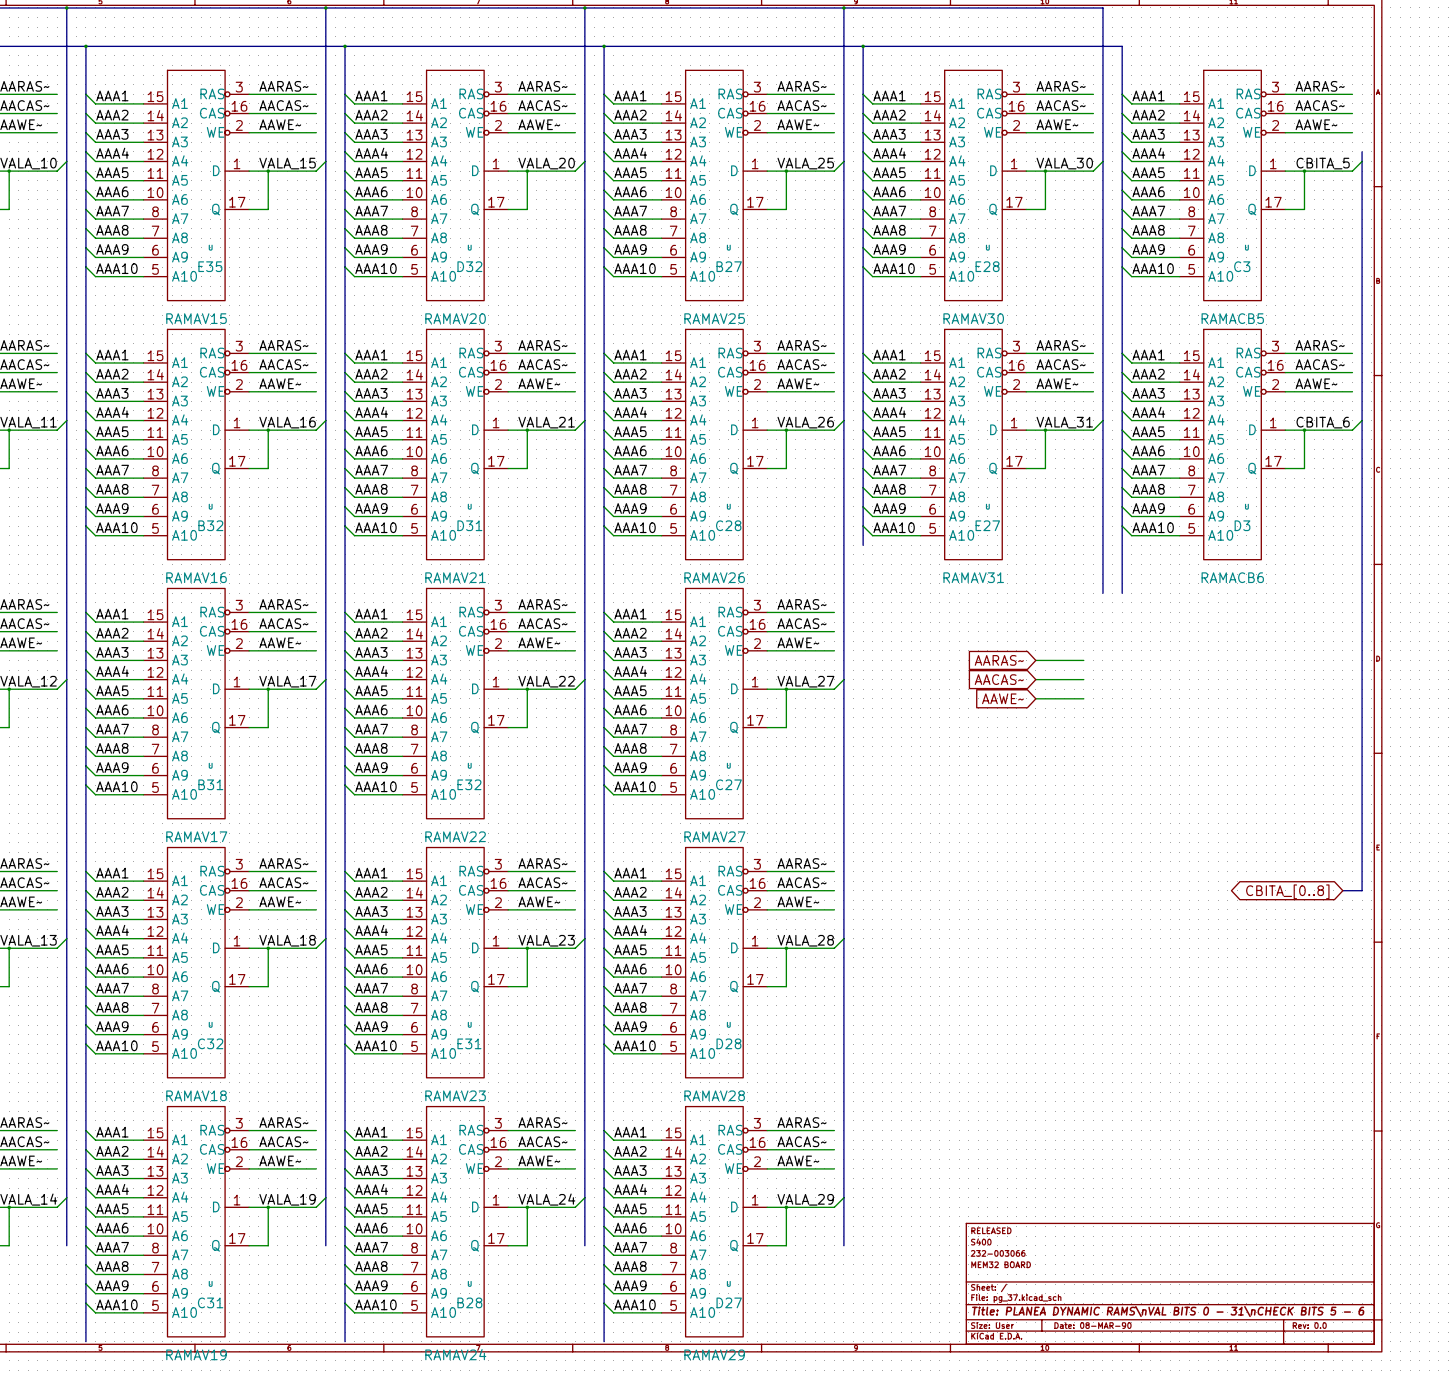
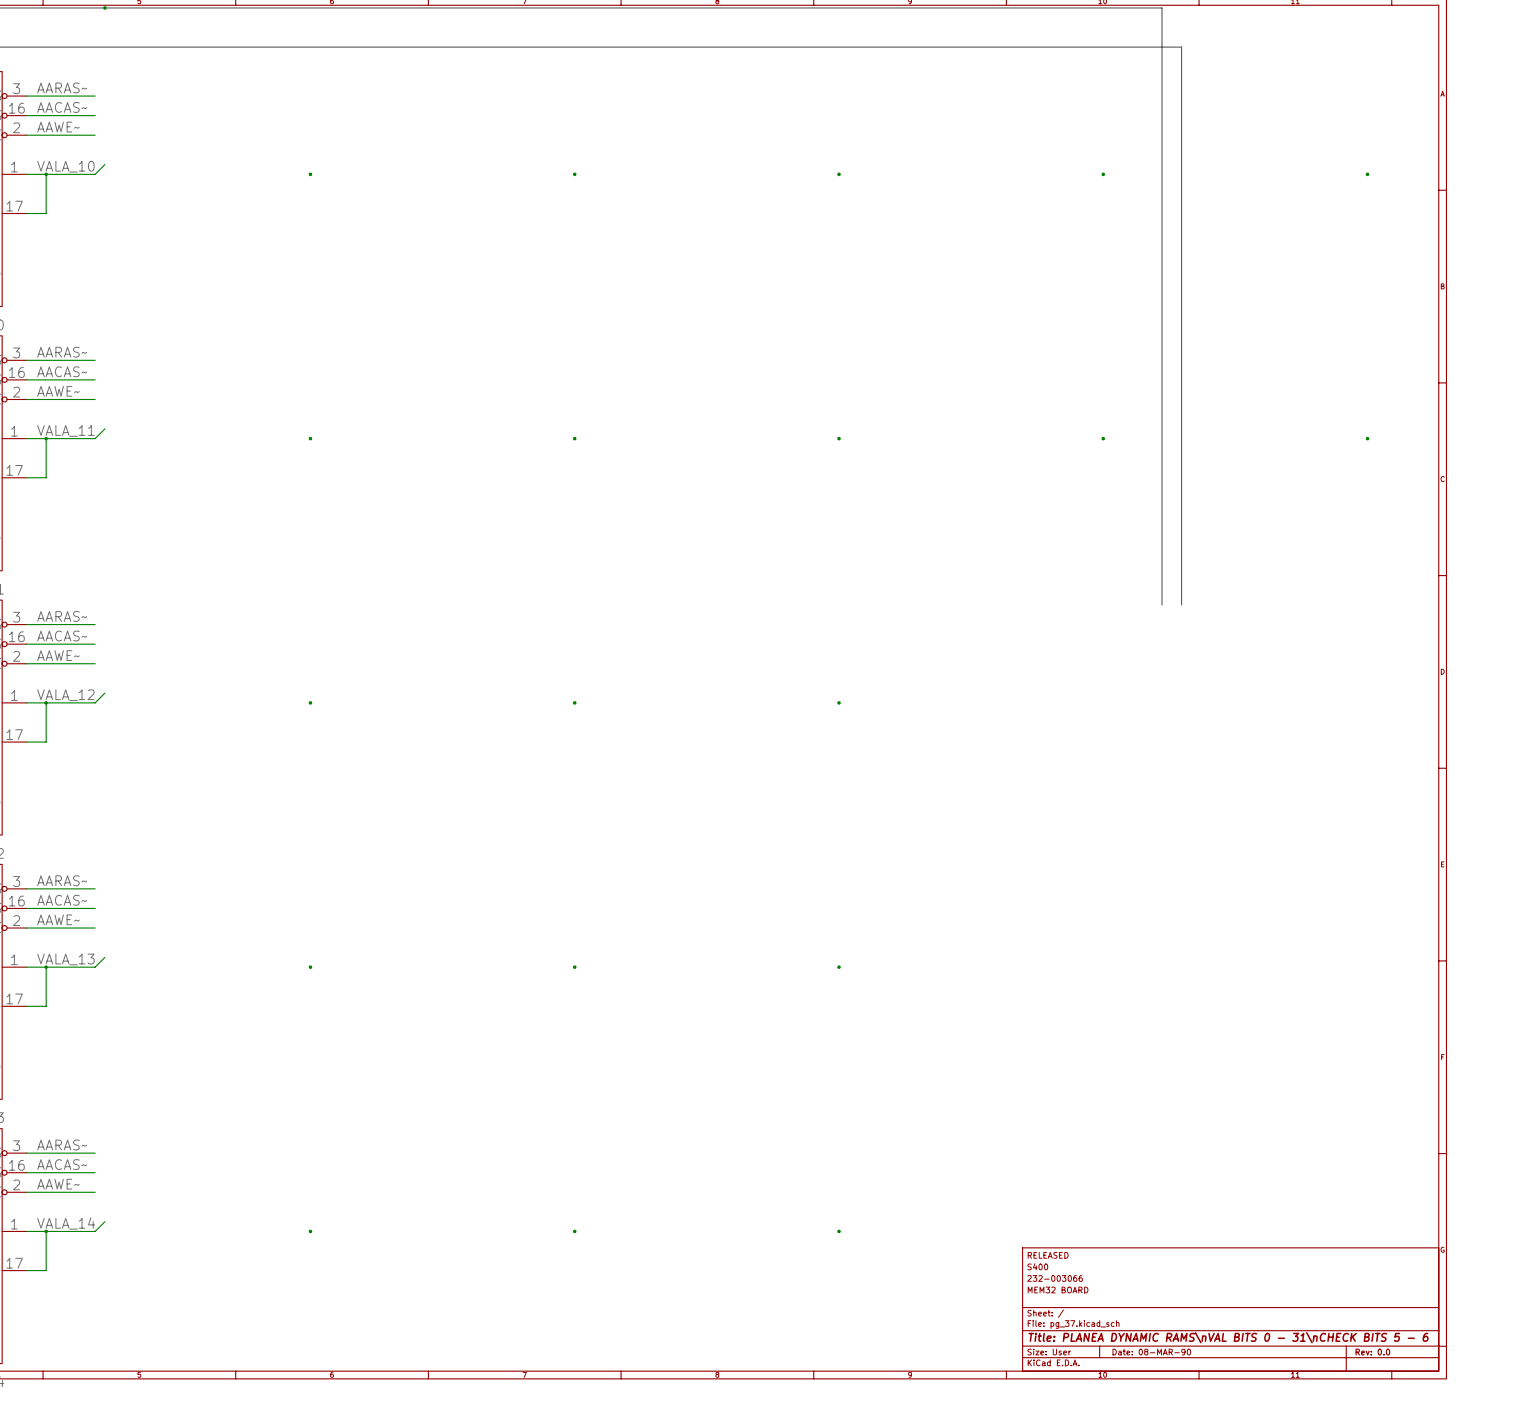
bus: (66, 7) (66, 1245) -> none
bus: (325, 7) (325, 1245) -> none
junction: (325, 7) -> none
bus: (584, 7) (584, 1245) -> none
junction: (584, 7) -> none
bus: (843, 7) (843, 1245) -> none
junction: (843, 7) -> none
bus: (85, 46) (85, 1341) -> none
junction: (85, 46) -> none
bus: (345, 46) (345, 1341) -> none
junction: (345, 46) -> none
bus: (604, 46) (604, 1341) -> none
junction: (604, 46) -> none
bus: (863, 46) (863, 545) -> none
junction: (863, 46) -> none
label: AARAS~ (283, 86) -> none
label: AARAS~ (542, 86) -> none
label: AARAS~ (802, 86) -> none
label: AARAS~ (1061, 86) -> none
label: AARAS~ (1320, 86) -> none
wire: (85, 94) (95, 103) (143, 103) -> none
wire: (249, 94) (316, 94) -> none
wire: (345, 94) (354, 103) (402, 103) -> none
wire: (508, 94) (575, 94) -> none
wire: (604, 94) (613, 103) (661, 103) -> none
wire: (767, 94) (834, 94) -> none
wire: (863, 94) (872, 103) (920, 103) -> none
wire: (1026, 94) (1093, 94) -> none
wire: (1122, 94) (1131, 103) (1179, 103) -> none
wire: (1285, 94) (1352, 94) -> none
label: AAA1 (112, 95) -> none
label: AAA1 (371, 95) -> none
label: AAA1 (630, 95) -> none
label: AAA1 (889, 95) -> none
label: AAA1 (1148, 95) -> none
label: AACAS~ (283, 105) -> none
label: AACAS~ (542, 105) -> none
label: AACAS~ (802, 105) -> none
label: AACAS~ (1061, 105) -> none
label: AACAS~ (1320, 105) -> none
wire: (85, 113) (95, 123) (143, 123) -> none
wire: (249, 113) (316, 113) -> none
wire: (345, 113) (354, 123) (402, 123) -> none
wire: (508, 113) (575, 113) -> none
wire: (604, 113) (613, 123) (661, 123) -> none
wire: (767, 113) (834, 113) -> none
wire: (863, 113) (872, 123) (920, 123) -> none
wire: (1026, 113) (1093, 113) -> none
wire: (1122, 113) (1131, 123) (1179, 123) -> none
wire: (1285, 113) (1352, 113) -> none
label: AAA2 (112, 115) -> none
label: AAA2 (371, 115) -> none
label: AAA2 (630, 115) -> none
label: AAA2 (889, 115) -> none
label: AAA2 (1148, 115) -> none
label: AAWE~ (280, 124) -> none
label: AAWE~ (539, 124) -> none
label: AAWE~ (798, 124) -> none
label: AAWE~ (1057, 124) -> none
label: AAWE~ (1316, 124) -> none
wire: (85, 132) (95, 142) (143, 142) -> none
wire: (249, 132) (316, 132) -> none
wire: (345, 132) (354, 142) (402, 142) -> none
wire: (508, 132) (575, 132) -> none
wire: (604, 132) (613, 142) (661, 142) -> none
wire: (767, 132) (834, 132) -> none
wire: (863, 132) (872, 142) (920, 142) -> none
wire: (1026, 132) (1093, 132) -> none
wire: (1122, 132) (1131, 142) (1179, 142) -> none
wire: (1285, 132) (1352, 132) -> none
label: AAA3 (112, 134) -> none
label: AAA3 (371, 134) -> none
label: AAA3 (630, 134) -> none
label: AAA3 (889, 134) -> none
label: AAA3 (1148, 134) -> none
wire: (85, 151) (95, 161) (143, 161) -> none
wire: (345, 151) (354, 161) (402, 161) -> none
wire: (604, 151) (613, 161) (661, 161) -> none
wire: (863, 151) (872, 161) (920, 161) -> none
wire: (1122, 151) (1131, 161) (1179, 161) -> none
bus: (1362, 151) (1362, 890) (1342, 890) -> none
label: AAA4 (112, 153) -> none
label: AAA4 (371, 153) -> none
label: AAA4 (630, 153) -> none
label: AAA4 (889, 153) -> none
label: AAA4 (1148, 153) -> none
wire: (325, 161) (316, 171) (249, 171) -> none
wire: (584, 161) (575, 171) (508, 171) -> none
wire: (843, 161) (834, 171) (767, 171) -> none
wire: (1102, 161) (1093, 171) (1026, 171) -> none
wire: (1362, 161) (1352, 171) (1285, 171) -> none
label: VALA_15 (287, 163) -> none
label: VALA_20 (546, 163) -> none
label: VALA_25 (805, 163) -> none
label: VALA_30 (1064, 163) -> none
label: CBITA_5 (1323, 163) -> none
wire: (85, 171) (95, 180) (143, 180) -> none
wire: (268, 171) (268, 209) (249, 209) -> none
wire: (345, 171) (354, 180) (402, 180) -> none
wire: (527, 171) (527, 209) (508, 209) -> none
wire: (604, 171) (613, 180) (661, 180) -> none
wire: (786, 171) (786, 209) (767, 209) -> none
wire: (863, 171) (872, 180) (920, 180) -> none
wire: (1045, 171) (1045, 209) (1026, 209) -> none
wire: (1122, 171) (1131, 180) (1179, 180) -> none
wire: (1304, 171) (1304, 209) (1285, 209) -> none
label: AAA5 (112, 172) -> none
label: AAA5 (371, 172) -> none
label: AAA5 (630, 172) -> none
label: AAA5 (889, 172) -> none
label: AAA5 (1148, 172) -> none
part: (196, 185) -> none
part: (455, 185) -> none
part: (714, 185) -> none
part: (973, 185) -> none
part: (1232, 185) -> none
wire: (85, 190) (95, 199) (143, 199) -> none
wire: (345, 190) (354, 199) (402, 199) -> none
wire: (604, 190) (613, 199) (661, 199) -> none
wire: (863, 190) (872, 199) (920, 199) -> none
wire: (1122, 190) (1131, 199) (1179, 199) -> none
label: AAA6 (112, 191) -> none
label: AAA6 (371, 191) -> none
label: AAA6 (630, 191) -> none
label: AAA6 (889, 191) -> none
label: AAA6 (1148, 191) -> none
wire: (85, 209) (95, 219) (143, 219) -> none
wire: (345, 209) (354, 219) (402, 219) -> none
wire: (604, 209) (613, 219) (661, 219) -> none
wire: (863, 209) (872, 219) (920, 219) -> none
wire: (1122, 209) (1131, 219) (1179, 219) -> none
label: AAA7 (112, 211) -> none
label: AAA7 (371, 211) -> none
label: AAA7 (630, 211) -> none
label: AAA7 (889, 211) -> none
label: AAA7 (1148, 211) -> none
wire: (85, 228) (95, 238) (143, 238) -> none
wire: (345, 228) (354, 238) (402, 238) -> none
wire: (604, 228) (613, 238) (661, 238) -> none
wire: (863, 228) (872, 238) (920, 238) -> none
wire: (1122, 228) (1131, 238) (1179, 238) -> none
label: AAA8 (112, 230) -> none
label: AAA8 (371, 230) -> none
label: AAA8 (630, 230) -> none
label: AAA8 (889, 230) -> none
label: AAA8 (1148, 230) -> none
wire: (85, 247) (95, 257) (143, 257) -> none
wire: (345, 247) (354, 257) (402, 257) -> none
wire: (604, 247) (613, 257) (661, 257) -> none
wire: (863, 247) (872, 257) (920, 257) -> none
wire: (1122, 247) (1131, 257) (1179, 257) -> none
label: AAA9 (112, 249) -> none
label: AAA9 (371, 249) -> none
label: AAA9 (630, 249) -> none
label: AAA9 (889, 249) -> none
label: AAA9 (1148, 249) -> none
wire: (85, 267) (95, 276) (143, 276) -> none
wire: (345, 267) (354, 276) (402, 276) -> none
wire: (604, 267) (613, 276) (661, 276) -> none
wire: (863, 267) (872, 276) (920, 276) -> none
wire: (1122, 267) (1131, 276) (1179, 276) -> none
label: AAA10 (116, 268) -> none
label: AAA10 (375, 268) -> none
label: AAA10 (635, 268) -> none
label: AAA10 (894, 268) -> none
label: AAA10 (1153, 268) -> none
label: AARAS~ (283, 345) -> none
label: AARAS~ (542, 345) -> none
label: AARAS~ (802, 345) -> none
label: AARAS~ (1061, 345) -> none
label: AARAS~ (1320, 345) -> none
wire: (85, 353) (95, 362) (143, 362) -> none
wire: (249, 353) (316, 353) -> none
wire: (345, 353) (354, 362) (402, 362) -> none
wire: (508, 353) (575, 353) -> none
wire: (604, 353) (613, 362) (661, 362) -> none
wire: (767, 353) (834, 353) -> none
wire: (863, 353) (872, 362) (920, 362) -> none
wire: (1026, 353) (1093, 353) -> none
wire: (1122, 353) (1131, 362) (1179, 362) -> none
wire: (1285, 353) (1352, 353) -> none
label: AAA1 (112, 355) -> none
label: AAA1 (371, 355) -> none
label: AAA1 (630, 355) -> none
label: AAA1 (889, 355) -> none
label: AAA1 (1148, 355) -> none
label: AACAS~ (283, 364) -> none
label: AACAS~ (542, 364) -> none
label: AACAS~ (802, 364) -> none
label: AACAS~ (1061, 364) -> none
label: AACAS~ (1320, 364) -> none
wire: (85, 372) (95, 382) (143, 382) -> none
wire: (249, 372) (316, 372) -> none
wire: (345, 372) (354, 382) (402, 382) -> none
wire: (508, 372) (575, 372) -> none
wire: (604, 372) (613, 382) (661, 382) -> none
wire: (767, 372) (834, 372) -> none
wire: (863, 372) (872, 382) (920, 382) -> none
wire: (1026, 372) (1093, 372) -> none
wire: (1122, 372) (1131, 382) (1179, 382) -> none
wire: (1285, 372) (1352, 372) -> none
label: AAA2 (112, 374) -> none
label: AAA2 (371, 374) -> none
label: AAA2 (630, 374) -> none
label: AAA2 (889, 374) -> none
label: AAA2 (1148, 374) -> none
label: AAWE~ (280, 383) -> none
label: AAWE~ (539, 383) -> none
label: AAWE~ (798, 383) -> none
label: AAWE~ (1057, 383) -> none
label: AAWE~ (1316, 383) -> none
wire: (85, 391) (95, 401) (143, 401) -> none
wire: (249, 391) (316, 391) -> none
wire: (345, 391) (354, 401) (402, 401) -> none
wire: (508, 391) (575, 391) -> none
wire: (604, 391) (613, 401) (661, 401) -> none
wire: (767, 391) (834, 391) -> none
wire: (863, 391) (872, 401) (920, 401) -> none
wire: (1026, 391) (1093, 391) -> none
wire: (1122, 391) (1131, 401) (1179, 401) -> none
wire: (1285, 391) (1352, 391) -> none
label: AAA3 (112, 393) -> none
label: AAA3 (371, 393) -> none
label: AAA3 (630, 393) -> none
label: AAA3 (889, 393) -> none
label: AAA3 (1148, 393) -> none
wire: (85, 410) (95, 420) (143, 420) -> none
wire: (345, 410) (354, 420) (402, 420) -> none
wire: (604, 410) (613, 420) (661, 420) -> none
wire: (863, 410) (872, 420) (920, 420) -> none
wire: (1122, 410) (1131, 420) (1179, 420) -> none
label: AAA4 (112, 412) -> none
label: AAA4 (371, 412) -> none
label: AAA4 (630, 412) -> none
label: AAA4 (889, 412) -> none
label: AAA4 (1148, 412) -> none
wire: (325, 420) (316, 430) (249, 430) -> none
wire: (584, 420) (575, 430) (508, 430) -> none
wire: (843, 420) (834, 430) (767, 430) -> none
wire: (1102, 420) (1093, 430) (1026, 430) -> none
wire: (1362, 420) (1352, 430) (1285, 430) -> none
label: VALA_16 (287, 422) -> none
label: VALA_21 (546, 422) -> none
label: VALA_26 (805, 422) -> none
label: VALA_31 (1064, 422) -> none
label: CBITA_6 (1323, 422) -> none
wire: (85, 430) (95, 439) (143, 439) -> none
wire: (268, 430) (268, 468) (249, 468) -> none
wire: (345, 430) (354, 439) (402, 439) -> none
wire: (527, 430) (527, 468) (508, 468) -> none
wire: (604, 430) (613, 439) (661, 439) -> none
wire: (786, 430) (786, 468) (767, 468) -> none
wire: (863, 430) (872, 439) (920, 439) -> none
wire: (1045, 430) (1045, 468) (1026, 468) -> none
wire: (1122, 430) (1131, 439) (1179, 439) -> none
wire: (1304, 430) (1304, 468) (1285, 468) -> none
label: AAA5 (112, 431) -> none
label: AAA5 (371, 431) -> none
label: AAA5 (630, 431) -> none
label: AAA5 (889, 431) -> none
label: AAA5 (1148, 431) -> none
part: (196, 444) -> none
part: (455, 444) -> none
part: (714, 444) -> none
part: (973, 444) -> none
part: (1232, 444) -> none
wire: (85, 449) (95, 458) (143, 458) -> none
wire: (345, 449) (354, 458) (402, 458) -> none
wire: (604, 449) (613, 458) (661, 458) -> none
wire: (863, 449) (872, 458) (920, 458) -> none
wire: (1122, 449) (1131, 458) (1179, 458) -> none
label: AAA6 (112, 450) -> none
label: AAA6 (371, 450) -> none
label: AAA6 (630, 450) -> none
label: AAA6 (889, 450) -> none
label: AAA6 (1148, 450) -> none
wire: (85, 468) (95, 478) (143, 478) -> none
wire: (345, 468) (354, 478) (402, 478) -> none
wire: (604, 468) (613, 478) (661, 478) -> none
wire: (863, 468) (872, 478) (920, 478) -> none
wire: (1122, 468) (1131, 478) (1179, 478) -> none
label: AAA7 (112, 470) -> none
label: AAA7 (371, 470) -> none
label: AAA7 (630, 470) -> none
label: AAA7 (889, 470) -> none
label: AAA7 (1148, 470) -> none
wire: (85, 487) (95, 497) (143, 497) -> none
wire: (345, 487) (354, 497) (402, 497) -> none
wire: (604, 487) (613, 497) (661, 497) -> none
wire: (863, 487) (872, 497) (920, 497) -> none
wire: (1122, 487) (1131, 497) (1179, 497) -> none
label: AAA8 (112, 489) -> none
label: AAA8 (371, 489) -> none
label: AAA8 (630, 489) -> none
label: AAA8 (889, 489) -> none
label: AAA8 (1148, 489) -> none
wire: (85, 506) (95, 516) (143, 516) -> none
wire: (345, 506) (354, 516) (402, 516) -> none
wire: (604, 506) (613, 516) (661, 516) -> none
wire: (863, 506) (872, 516) (920, 516) -> none
wire: (1122, 506) (1131, 516) (1179, 516) -> none
label: AAA9 (112, 508) -> none
label: AAA9 (371, 508) -> none
label: AAA9 (630, 508) -> none
label: AAA9 (889, 508) -> none
label: AAA9 (1148, 508) -> none
wire: (85, 526) (95, 535) (143, 535) -> none
wire: (345, 526) (354, 535) (402, 535) -> none
wire: (604, 526) (613, 535) (661, 535) -> none
wire: (863, 526) (872, 535) (920, 535) -> none
wire: (1122, 526) (1131, 535) (1179, 535) -> none
label: AAA10 (116, 527) -> none
label: AAA10 (375, 527) -> none
label: AAA10 (635, 527) -> none
label: AAA10 (894, 527) -> none
label: AAA10 (1153, 527) -> none
label: AARAS~ (283, 604) -> none
label: AARAS~ (542, 604) -> none
label: AARAS~ (802, 604) -> none
wire: (85, 612) (95, 622) (143, 622) -> none
wire: (249, 612) (316, 612) -> none
wire: (345, 612) (354, 622) (402, 622) -> none
wire: (508, 612) (575, 612) -> none
wire: (604, 612) (613, 622) (661, 622) -> none
wire: (767, 612) (834, 612) -> none
label: AAA1 (112, 614) -> none
label: AAA1 (371, 614) -> none
label: AAA1 (630, 614) -> none
label: AACAS~ (283, 623) -> none
label: AACAS~ (542, 623) -> none
label: AACAS~ (802, 623) -> none
wire: (85, 631) (95, 641) (143, 641) -> none
wire: (249, 631) (316, 631) -> none
wire: (345, 631) (354, 641) (402, 641) -> none
wire: (508, 631) (575, 631) -> none
wire: (604, 631) (613, 641) (661, 641) -> none
wire: (767, 631) (834, 631) -> none
label: AAA2 (112, 633) -> none
label: AAA2 (371, 633) -> none
label: AAA2 (630, 633) -> none
label: AAWE~ (280, 642) -> none
label: AAWE~ (539, 642) -> none
label: AAWE~ (798, 642) -> none
wire: (85, 650) (95, 660) (143, 660) -> none
wire: (249, 650) (316, 650) -> none
wire: (345, 650) (354, 660) (402, 660) -> none
wire: (508, 650) (575, 650) -> none
wire: (604, 650) (613, 660) (661, 660) -> none
wire: (767, 650) (834, 650) -> none
label: AAA3 (112, 652) -> none
label: AAA3 (371, 652) -> none
label: AAA3 (630, 652) -> none
global label: AARAS~ (999, 660) -> none
wire: (1035, 660) (1083, 660) -> none
wire: (85, 670) (95, 679) (143, 679) -> none
wire: (345, 670) (354, 679) (402, 679) -> none
wire: (604, 670) (613, 679) (661, 679) -> none
label: AAA4 (112, 671) -> none
label: AAA4 (371, 671) -> none
label: AAA4 (630, 671) -> none
wire: (325, 679) (316, 689) (249, 689) -> none
wire: (584, 679) (575, 689) (508, 689) -> none
wire: (843, 679) (834, 689) (767, 689) -> none
global label: AACAS~ (999, 679) -> none
wire: (1035, 679) (1083, 679) -> none
label: VALA_17 (287, 681) -> none
label: VALA_22 (546, 681) -> none
label: VALA_27 (805, 681) -> none
wire: (85, 689) (95, 698) (143, 698) -> none
wire: (268, 689) (268, 727) (249, 727) -> none
wire: (345, 689) (354, 698) (402, 698) -> none
wire: (527, 689) (527, 727) (508, 727) -> none
wire: (604, 689) (613, 698) (661, 698) -> none
wire: (786, 689) (786, 727) (767, 727) -> none
label: AAA5 (112, 690) -> none
label: AAA5 (371, 690) -> none
label: AAA5 (630, 690) -> none
global label: AAWE~ (1002, 698) -> none
wire: (1035, 698) (1083, 698) -> none
part: (196, 703) -> none
part: (455, 703) -> none
part: (714, 703) -> none
wire: (85, 708) (95, 717) (143, 717) -> none
wire: (345, 708) (354, 717) (402, 717) -> none
wire: (604, 708) (613, 717) (661, 717) -> none
label: AAA6 (112, 710) -> none
label: AAA6 (371, 710) -> none
label: AAA6 (630, 710) -> none
wire: (85, 727) (95, 737) (143, 737) -> none
wire: (345, 727) (354, 737) (402, 737) -> none
wire: (604, 727) (613, 737) (661, 737) -> none
label: AAA7 (112, 729) -> none
label: AAA7 (371, 729) -> none
label: AAA7 (630, 729) -> none
wire: (85, 746) (95, 756) (143, 756) -> none
wire: (345, 746) (354, 756) (402, 756) -> none
wire: (604, 746) (613, 756) (661, 756) -> none
label: AAA8 (112, 748) -> none
label: AAA8 (371, 748) -> none
label: AAA8 (630, 748) -> none
wire: (85, 765) (95, 775) (143, 775) -> none
wire: (345, 765) (354, 775) (402, 775) -> none
wire: (604, 765) (613, 775) (661, 775) -> none
label: AAA9 (112, 767) -> none
label: AAA9 (371, 767) -> none
label: AAA9 (630, 767) -> none
wire: (85, 785) (95, 794) (143, 794) -> none
wire: (345, 785) (354, 794) (402, 794) -> none
wire: (604, 785) (613, 794) (661, 794) -> none
label: AAA10 (116, 786) -> none
label: AAA10 (375, 786) -> none
label: AAA10 (635, 786) -> none
label: AARAS~ (283, 863) -> none
label: AARAS~ (542, 863) -> none
label: AARAS~ (802, 863) -> none
wire: (85, 871) (95, 881) (143, 881) -> none
wire: (249, 871) (316, 871) -> none
wire: (345, 871) (354, 881) (402, 881) -> none
wire: (508, 871) (575, 871) -> none
wire: (604, 871) (613, 881) (661, 881) -> none
wire: (767, 871) (834, 871) -> none
label: AAA1 (112, 873) -> none
label: AAA1 (371, 873) -> none
label: AAA1 (630, 873) -> none
label: AACAS~ (283, 882) -> none
label: AACAS~ (542, 882) -> none
label: AACAS~ (802, 882) -> none
wire: (85, 890) (95, 900) (143, 900) -> none
wire: (249, 890) (316, 890) -> none
wire: (345, 890) (354, 900) (402, 900) -> none
wire: (508, 890) (575, 890) -> none
wire: (604, 890) (613, 900) (661, 900) -> none
wire: (767, 890) (834, 890) -> none
global label: CBITA_[0..8] (1287, 891) -> none
label: AAA2 (112, 892) -> none
label: AAA2 (371, 892) -> none
label: AAA2 (630, 892) -> none
label: AAWE~ (280, 901) -> none
label: AAWE~ (539, 901) -> none
label: AAWE~ (798, 901) -> none
wire: (85, 909) (95, 919) (143, 919) -> none
wire: (249, 909) (316, 909) -> none
wire: (345, 909) (354, 919) (402, 919) -> none
wire: (508, 909) (575, 909) -> none
wire: (604, 909) (613, 919) (661, 919) -> none
wire: (767, 909) (834, 909) -> none
label: AAA3 (112, 911) -> none
label: AAA3 (371, 911) -> none
label: AAA3 (630, 911) -> none
wire: (85, 929) (95, 938) (143, 938) -> none
wire: (345, 929) (354, 938) (402, 938) -> none
wire: (604, 929) (613, 938) (661, 938) -> none
label: AAA4 (112, 930) -> none
label: AAA4 (371, 930) -> none
label: AAA4 (630, 930) -> none
wire: (325, 938) (316, 948) (249, 948) -> none
wire: (584, 938) (575, 948) (508, 948) -> none
wire: (843, 938) (834, 948) (767, 948) -> none
label: VALA_18 (287, 940) -> none
label: VALA_23 (546, 940) -> none
label: VALA_28 (805, 940) -> none
wire: (85, 948) (95, 957) (143, 957) -> none
wire: (268, 948) (268, 986) (249, 986) -> none
wire: (345, 948) (354, 957) (402, 957) -> none
wire: (527, 948) (527, 986) (508, 986) -> none
wire: (604, 948) (613, 957) (661, 957) -> none
wire: (786, 948) (786, 986) (767, 986) -> none
label: AAA5 (112, 949) -> none
label: AAA5 (371, 949) -> none
label: AAA5 (630, 949) -> none
part: (196, 962) -> none
part: (455, 962) -> none
part: (714, 962) -> none
wire: (85, 967) (95, 977) (143, 977) -> none
wire: (345, 967) (354, 977) (402, 977) -> none
wire: (604, 967) (613, 977) (661, 977) -> none
label: AAA6 (112, 969) -> none
label: AAA6 (371, 969) -> none
label: AAA6 (630, 969) -> none
wire: (85, 986) (95, 996) (143, 996) -> none
wire: (345, 986) (354, 996) (402, 996) -> none
wire: (604, 986) (613, 996) (661, 996) -> none
label: AAA7 (112, 988) -> none
label: AAA7 (371, 988) -> none
label: AAA7 (630, 988) -> none
wire: (85, 1005) (95, 1015) (143, 1015) -> none
wire: (345, 1005) (354, 1015) (402, 1015) -> none
wire: (604, 1005) (613, 1015) (661, 1015) -> none
label: AAA8 (112, 1007) -> none
label: AAA8 (371, 1007) -> none
label: AAA8 (630, 1007) -> none
wire: (85, 1025) (95, 1034) (143, 1034) -> none
wire: (345, 1025) (354, 1034) (402, 1034) -> none
wire: (604, 1025) (613, 1034) (661, 1034) -> none
label: AAA9 (112, 1026) -> none
label: AAA9 (371, 1026) -> none
label: AAA9 (630, 1026) -> none
wire: (85, 1044) (95, 1053) (143, 1053) -> none
wire: (345, 1044) (354, 1053) (402, 1053) -> none
wire: (604, 1044) (613, 1053) (661, 1053) -> none
label: AAA10 (116, 1045) -> none
label: AAA10 (375, 1045) -> none
label: AAA10 (635, 1045) -> none
label: AARAS~ (283, 1122) -> none
label: AARAS~ (542, 1122) -> none
label: AARAS~ (802, 1122) -> none
wire: (85, 1130) (95, 1140) (143, 1140) -> none
wire: (249, 1130) (316, 1130) -> none
wire: (345, 1130) (354, 1140) (402, 1140) -> none
wire: (508, 1130) (575, 1130) -> none
wire: (604, 1130) (613, 1140) (661, 1140) -> none
wire: (767, 1130) (834, 1130) -> none
label: AAA1 (112, 1132) -> none
label: AAA1 (371, 1132) -> none
label: AAA1 (630, 1132) -> none
label: AACAS~ (283, 1141) -> none
label: AACAS~ (542, 1141) -> none
label: AACAS~ (802, 1141) -> none
wire: (85, 1149) (95, 1159) (143, 1159) -> none
wire: (249, 1149) (316, 1149) -> none
wire: (345, 1149) (354, 1159) (402, 1159) -> none
wire: (508, 1149) (575, 1149) -> none
wire: (604, 1149) (613, 1159) (661, 1159) -> none
wire: (767, 1149) (834, 1149) -> none
label: AAA2 (112, 1151) -> none
label: AAA2 (371, 1151) -> none
label: AAA2 (630, 1151) -> none
label: AAWE~ (280, 1160) -> none
label: AAWE~ (539, 1160) -> none
label: AAWE~ (798, 1160) -> none
wire: (85, 1168) (95, 1178) (143, 1178) -> none
wire: (249, 1168) (316, 1168) -> none
wire: (345, 1168) (354, 1178) (402, 1178) -> none
wire: (508, 1168) (575, 1168) -> none
wire: (604, 1168) (613, 1178) (661, 1178) -> none
wire: (767, 1168) (834, 1168) -> none
label: AAA3 (112, 1170) -> none
label: AAA3 (371, 1170) -> none
label: AAA3 (630, 1170) -> none
wire: (85, 1188) (95, 1197) (143, 1197) -> none
wire: (345, 1188) (354, 1197) (402, 1197) -> none
wire: (604, 1188) (613, 1197) (661, 1197) -> none
label: AAA4 (112, 1189) -> none
label: AAA4 (371, 1189) -> none
label: AAA4 (630, 1189) -> none
wire: (325, 1197) (316, 1207) (249, 1207) -> none
wire: (584, 1197) (575, 1207) (508, 1207) -> none
wire: (843, 1197) (834, 1207) (767, 1207) -> none
label: VALA_19 (287, 1199) -> none
label: VALA_24 (546, 1199) -> none
label: VALA_29 (805, 1199) -> none
wire: (85, 1207) (95, 1216) (143, 1216) -> none
wire: (268, 1207) (268, 1245) (249, 1245) -> none
wire: (345, 1207) (354, 1216) (402, 1216) -> none
wire: (527, 1207) (527, 1245) (508, 1245) -> none
wire: (604, 1207) (613, 1216) (661, 1216) -> none
wire: (786, 1207) (786, 1245) (767, 1245) -> none
label: AAA5 (112, 1208) -> none
label: AAA5 (371, 1208) -> none
label: AAA5 (630, 1208) -> none
part: (196, 1221) -> none
part: (455, 1221) -> none
part: (714, 1221) -> none
wire: (85, 1226) (95, 1236) (143, 1236) -> none
wire: (345, 1226) (354, 1236) (402, 1236) -> none
wire: (604, 1226) (613, 1236) (661, 1236) -> none
label: AAA6 (112, 1228) -> none
label: AAA6 (371, 1228) -> none
label: AAA6 (630, 1228) -> none
wire: (85, 1245) (95, 1255) (143, 1255) -> none
wire: (345, 1245) (354, 1255) (402, 1255) -> none
wire: (604, 1245) (613, 1255) (661, 1255) -> none
label: AAA7 (112, 1247) -> none
label: AAA7 (371, 1247) -> none
label: AAA7 (630, 1247) -> none
wire: (85, 1264) (95, 1274) (143, 1274) -> none
wire: (345, 1264) (354, 1274) (402, 1274) -> none
wire: (604, 1264) (613, 1274) (661, 1274) -> none
label: AAA8 (112, 1266) -> none
label: AAA8 (371, 1266) -> none
label: AAA8 (630, 1266) -> none
wire: (85, 1284) (95, 1293) (143, 1293) -> none
wire: (345, 1284) (354, 1293) (402, 1293) -> none
wire: (604, 1284) (613, 1293) (661, 1293) -> none
label: AAA9 (112, 1285) -> none
label: AAA9 (371, 1285) -> none
label: AAA9 (630, 1285) -> none
wire: (85, 1303) (95, 1312) (143, 1312) -> none
wire: (345, 1303) (354, 1312) (402, 1312) -> none
wire: (604, 1303) (613, 1312) (661, 1312) -> none
label: AAA10 (116, 1304) -> none
label: AAA10 (375, 1304) -> none
label: AAA10 (635, 1304) -> none

